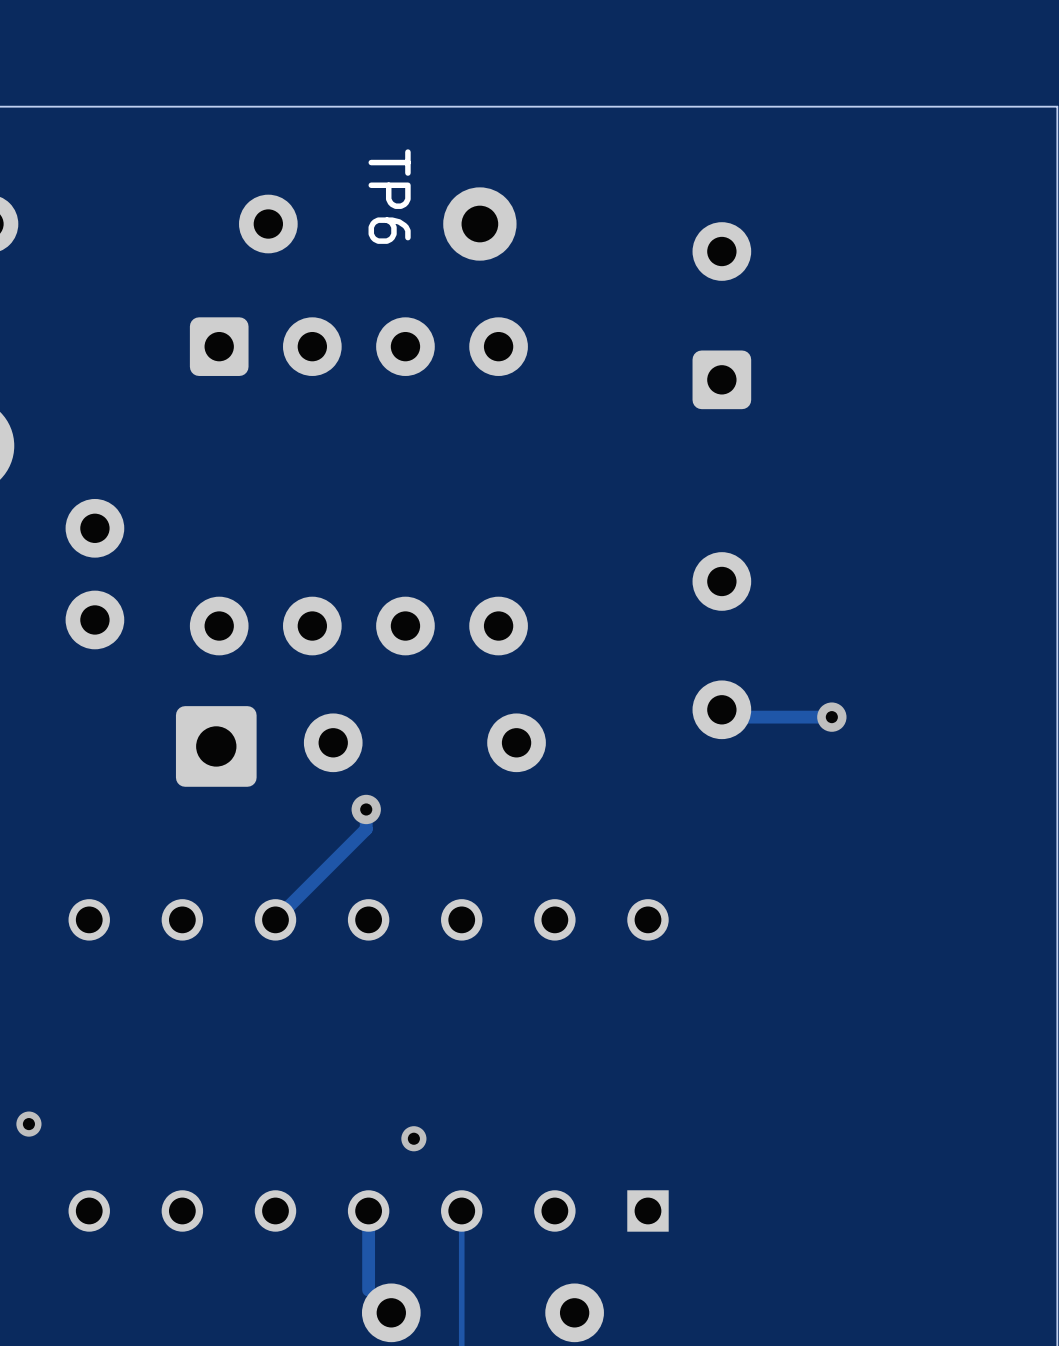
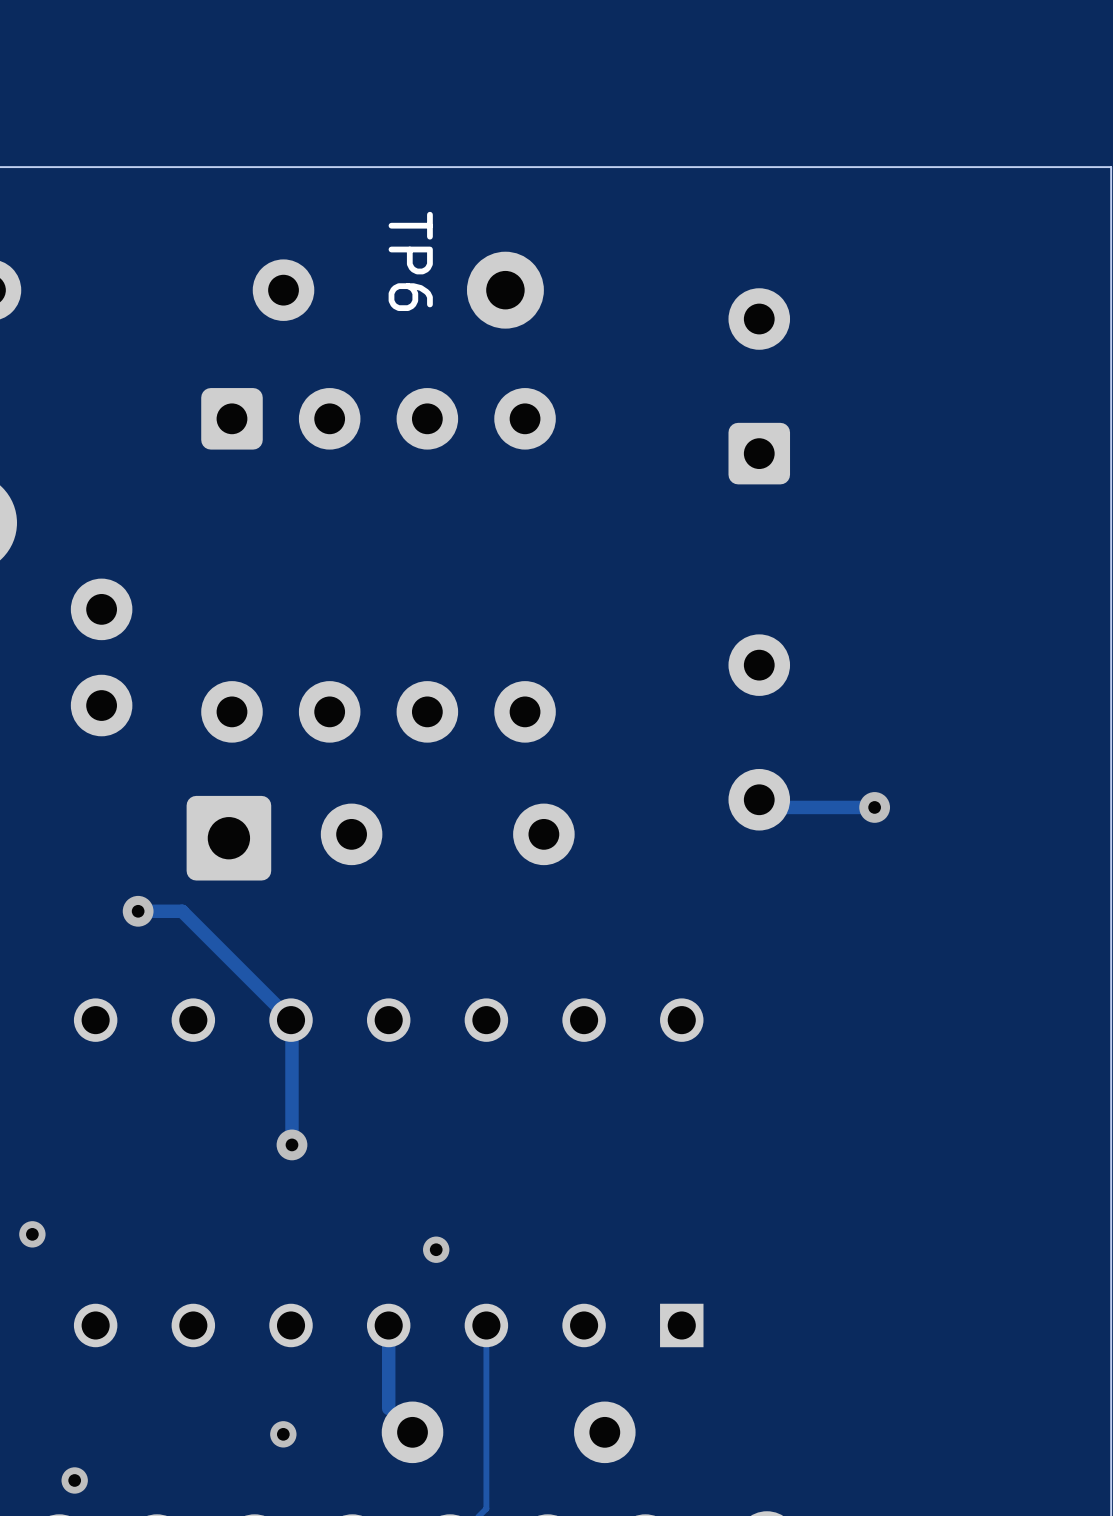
track: (366, 809) (366, 829) (275, 919) -> (138, 911) (182, 911) (291, 1020)
via: (366, 809) -> none
via: none -> (138, 911)
track: none -> (291, 1021) (291, 1144)
via: none -> (291, 1144)
via: none -> (283, 1434)

